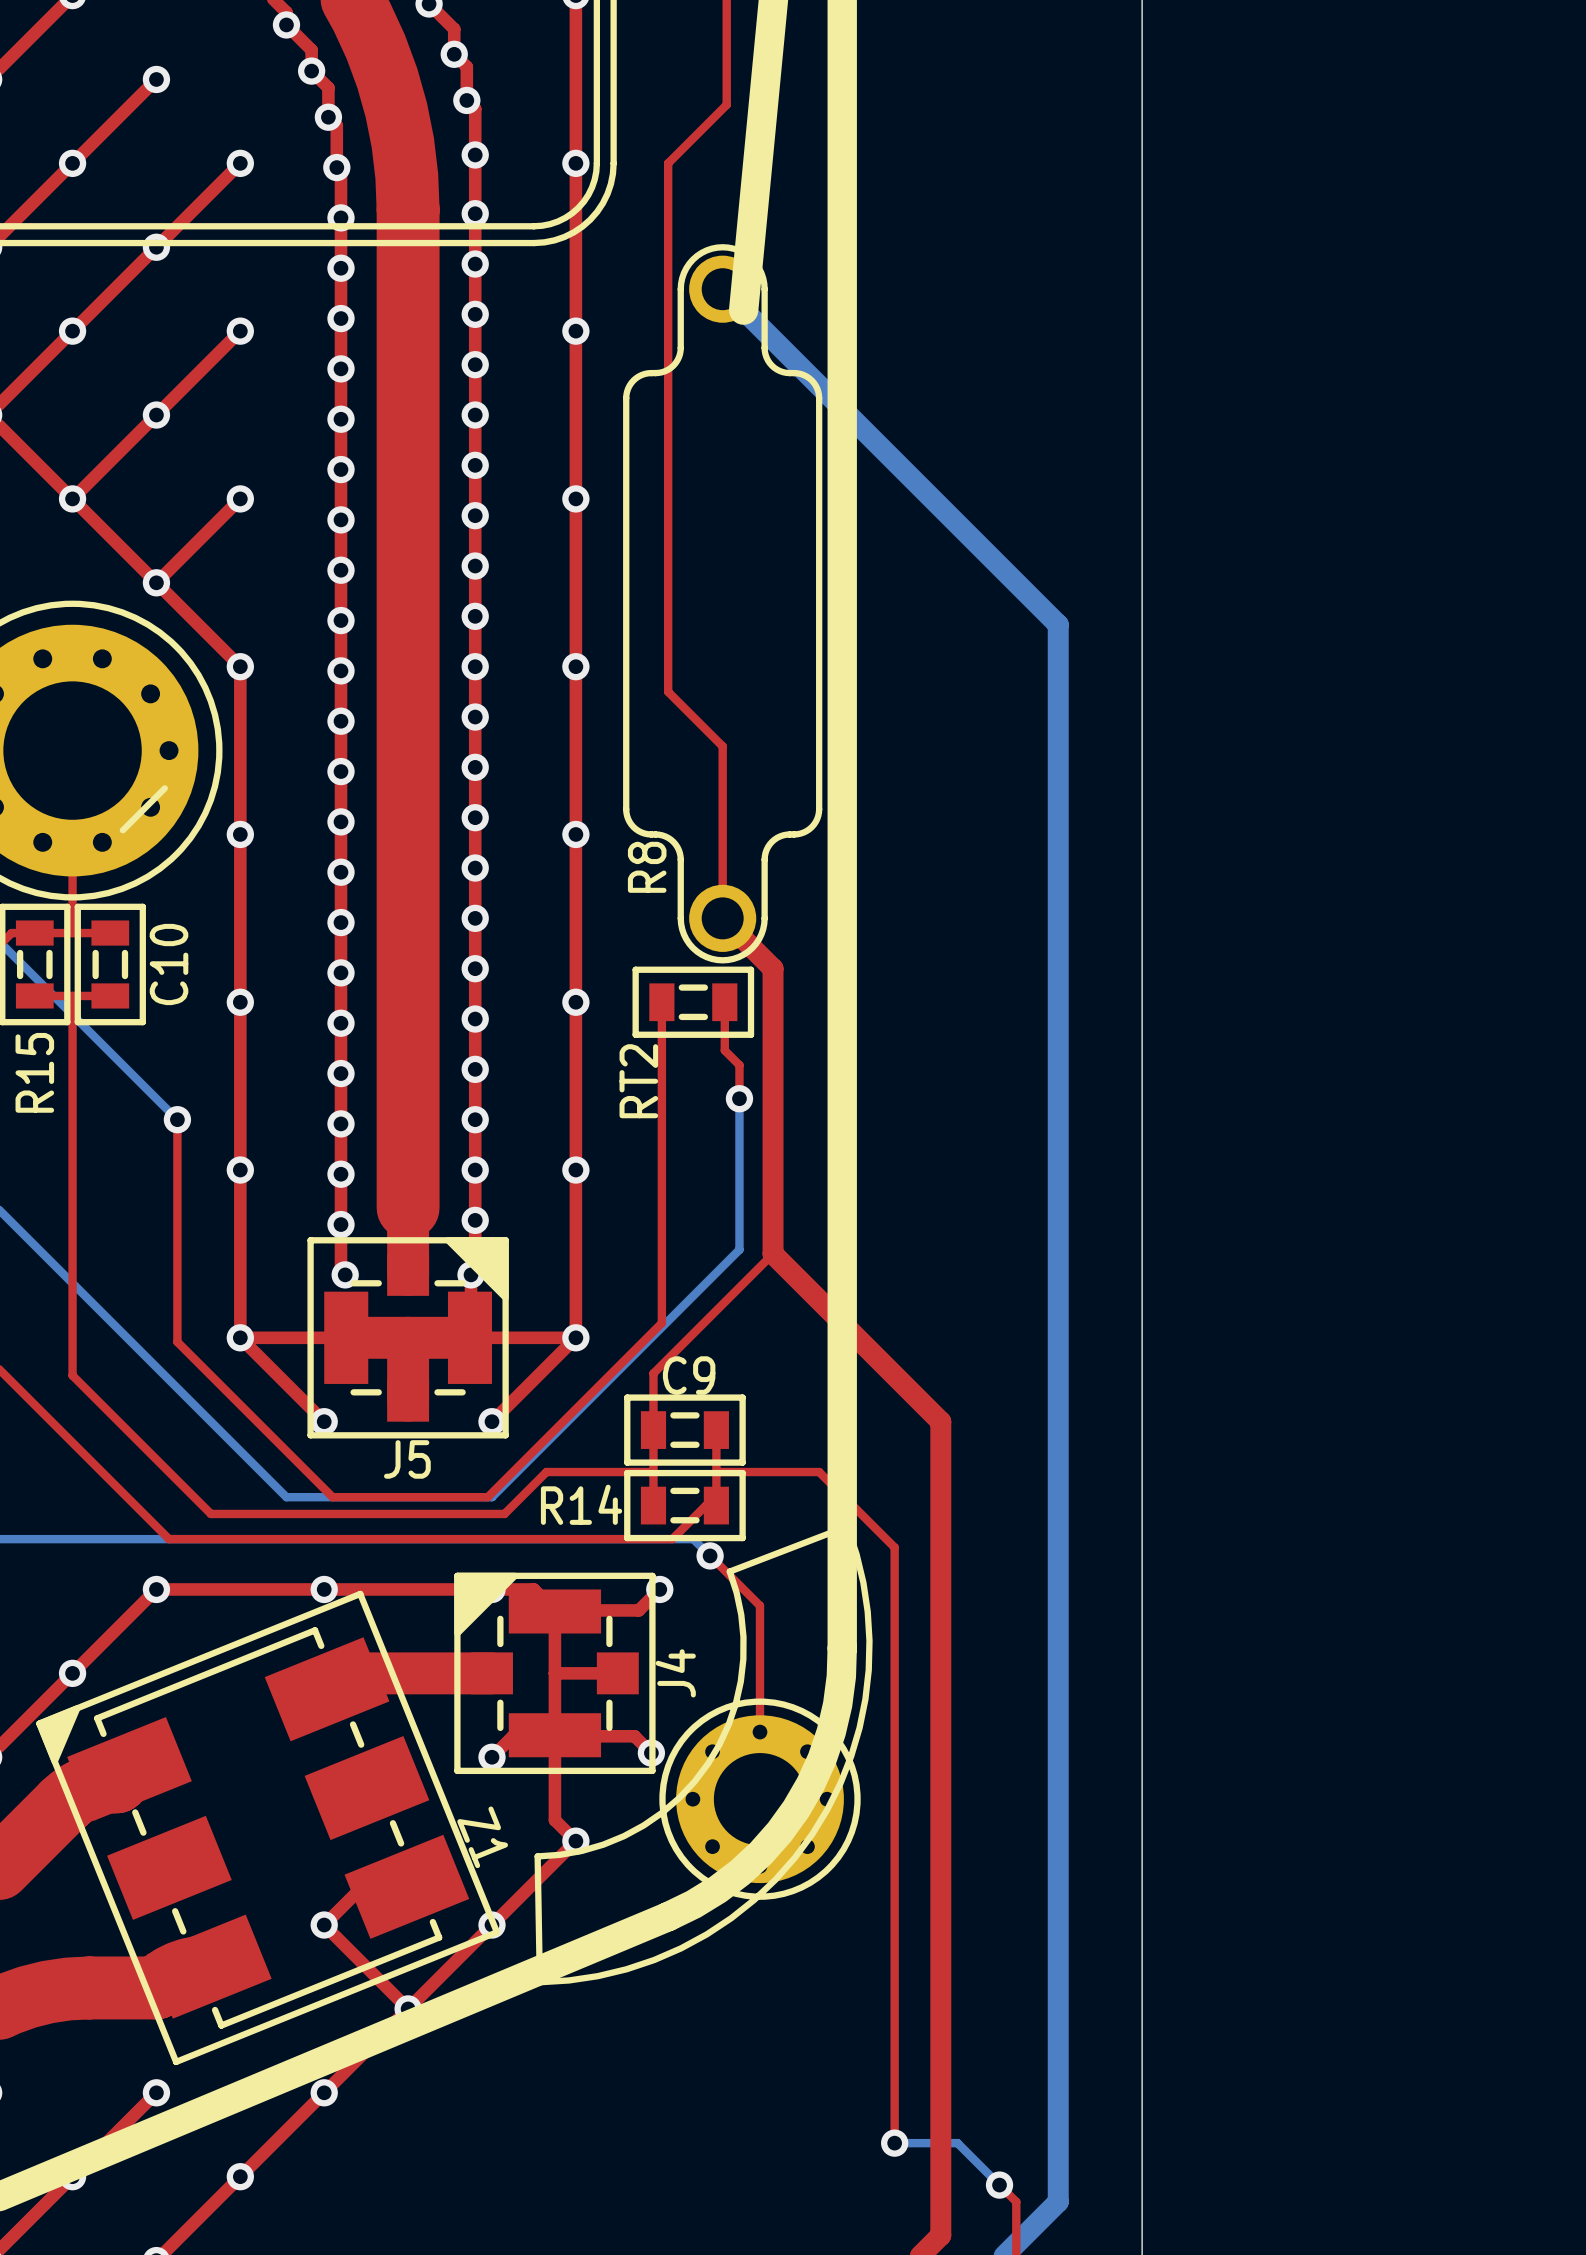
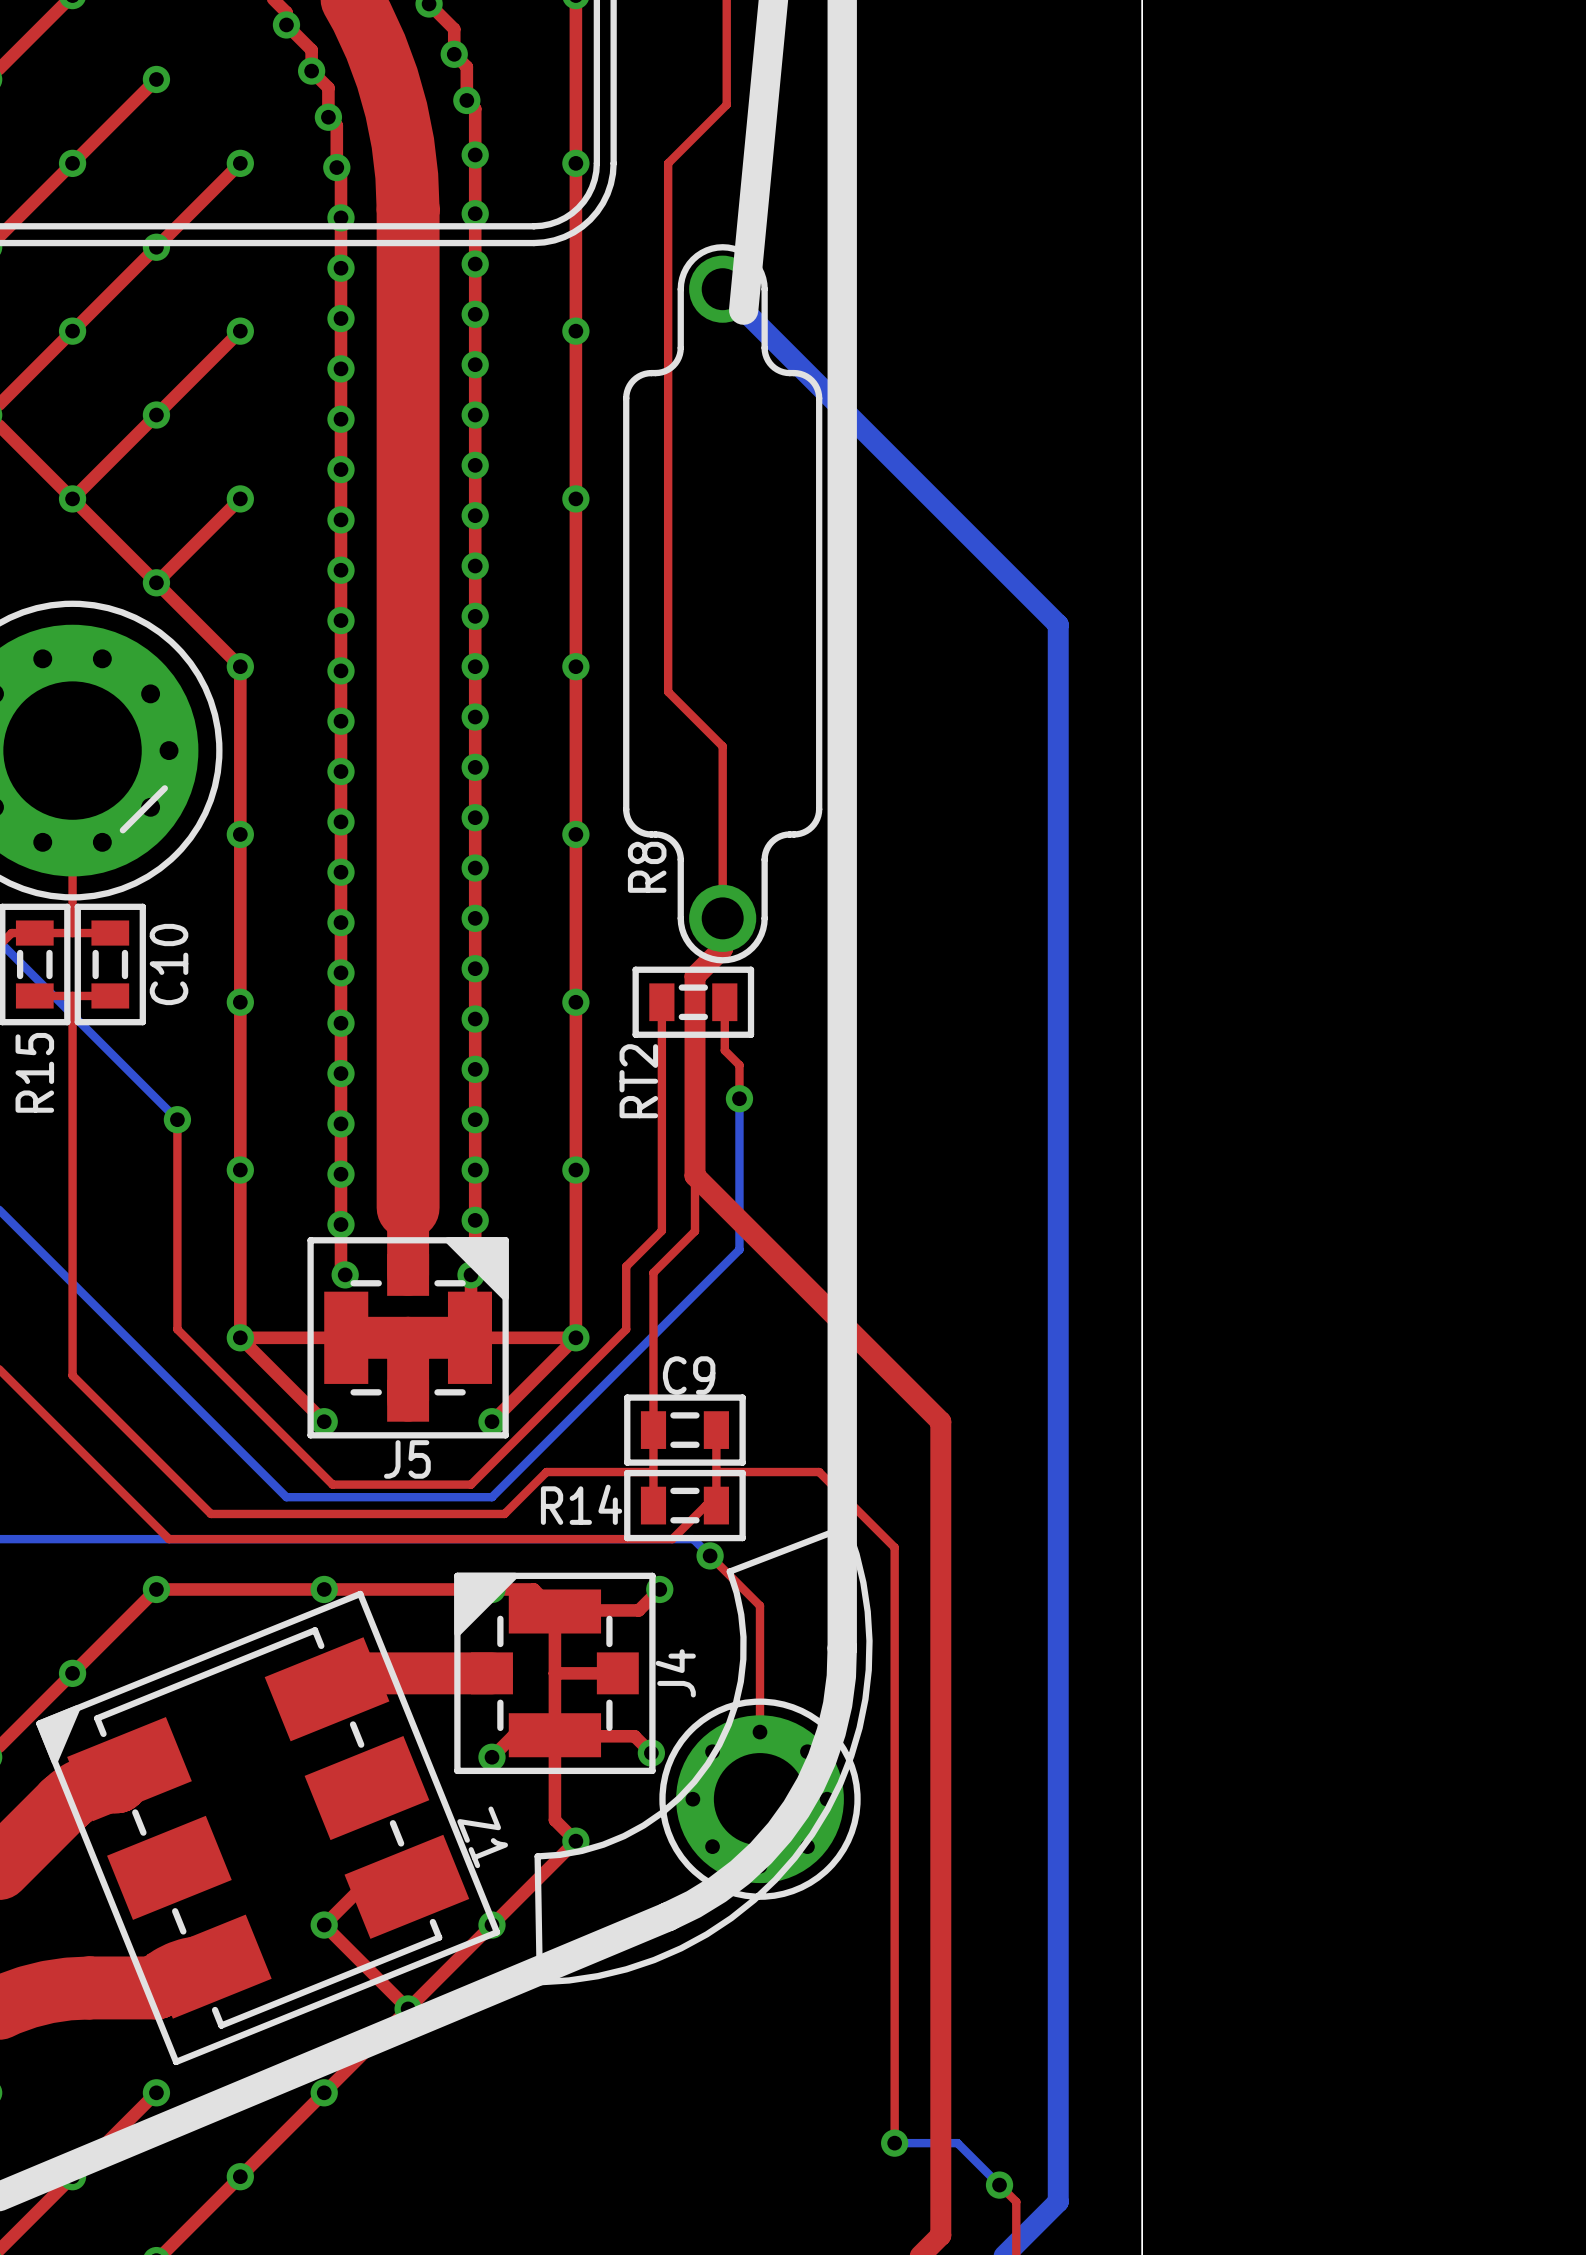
top track: (722, 918) (773, 968) (773, 1253) (653, 1373) -> (722, 918) (722, 948) (695, 976) (695, 1175)
top track: none -> (695, 1175) (695, 1231) (653, 1272) (653, 1373)
top track: none -> (695, 1175) (773, 1253)
top track: (661, 1230) (661, 1323) (487, 1497) (332, 1497) (177, 1342) (177, 1329) -> (661, 1230) (626, 1266) (626, 1329) (471, 1484) (332, 1484) (177, 1329)

